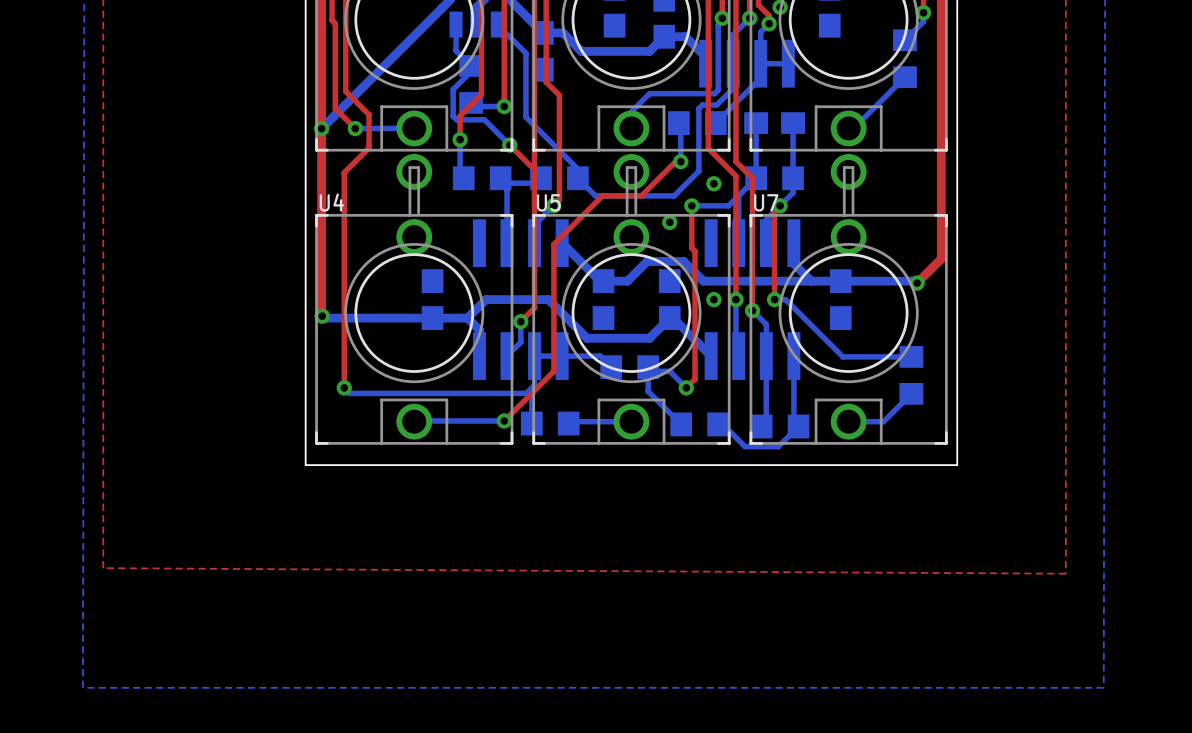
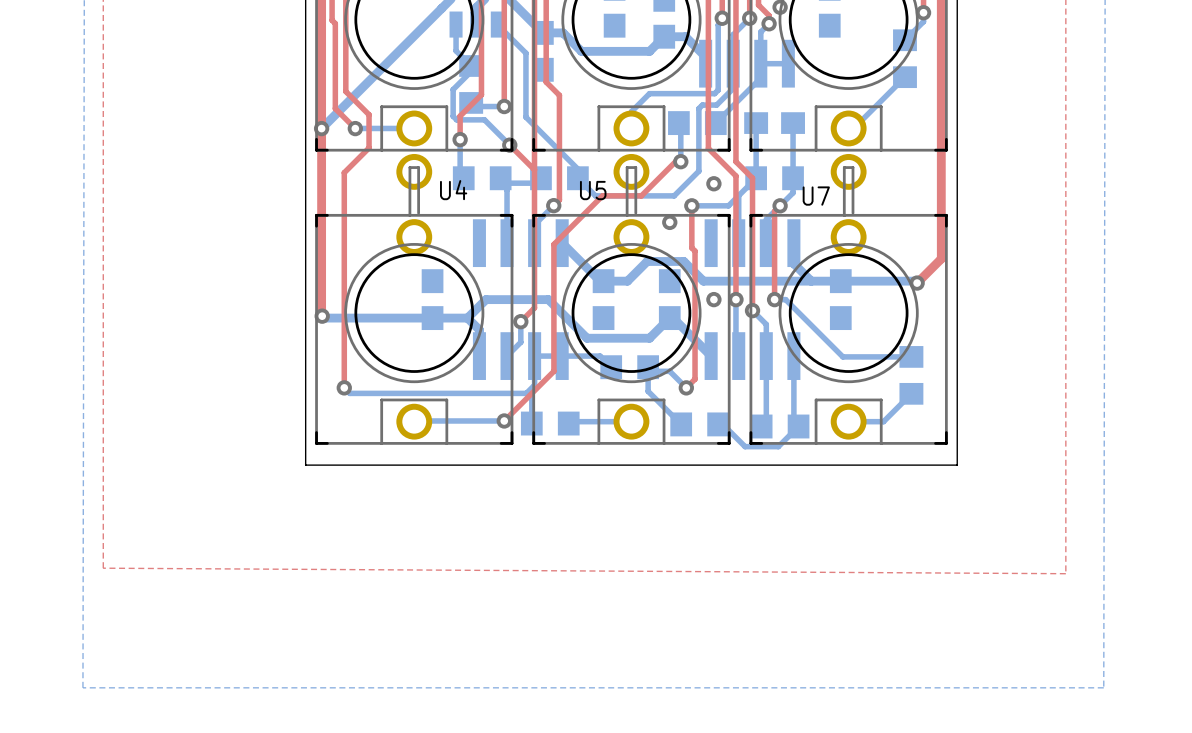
U4 name position: U4 (331, 202) -> U4 (453, 190)
U5 name position: U5 (548, 202) -> U5 (593, 190)
U7 name position: U7 (766, 202) -> U7 (816, 196)

